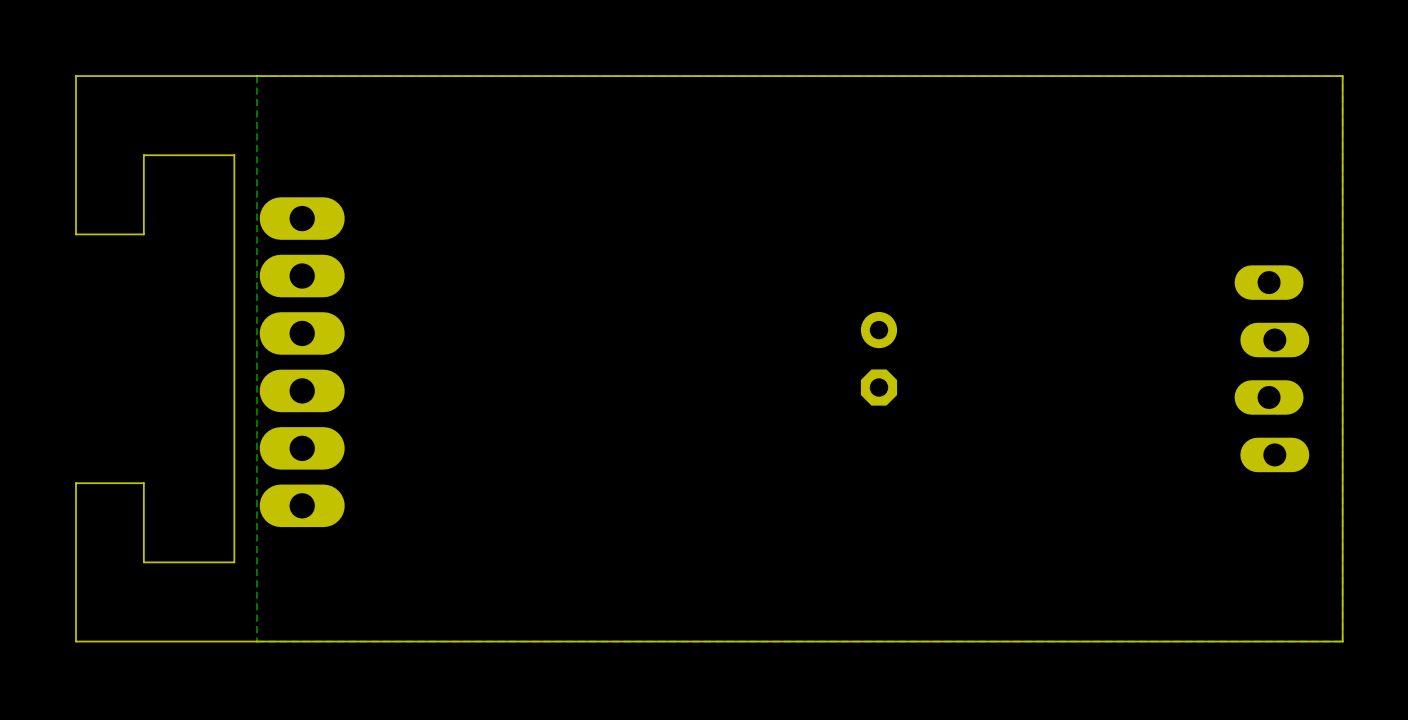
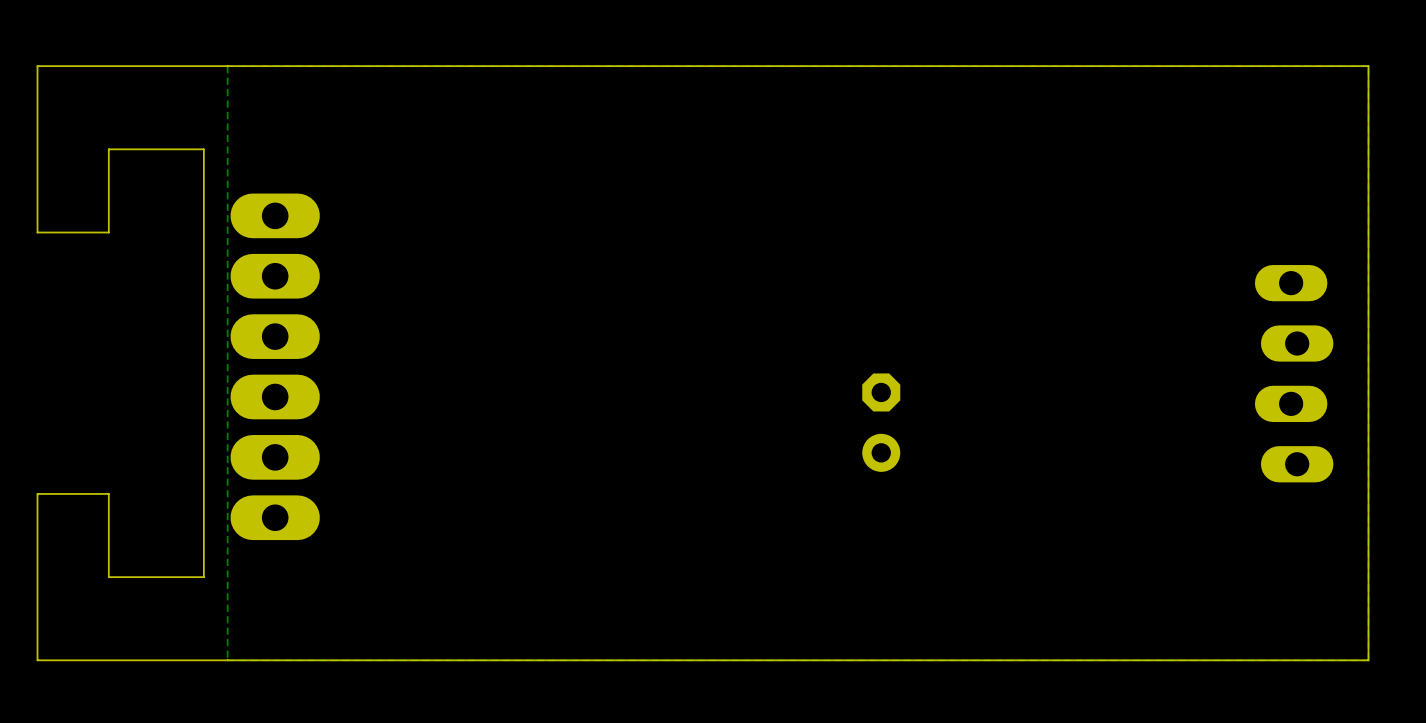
part rotation: 0° (878, 358) -> 180° (881, 422)
part position: (878, 358) -> (881, 422)

